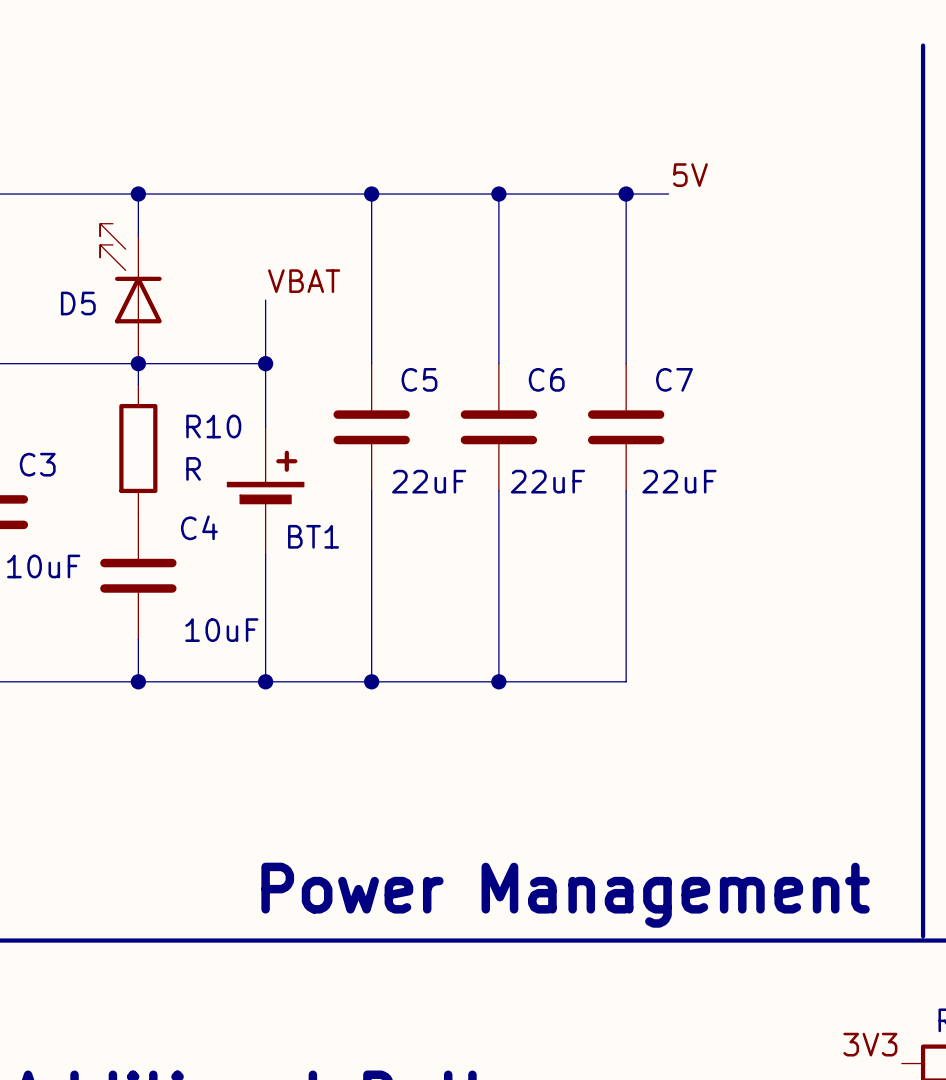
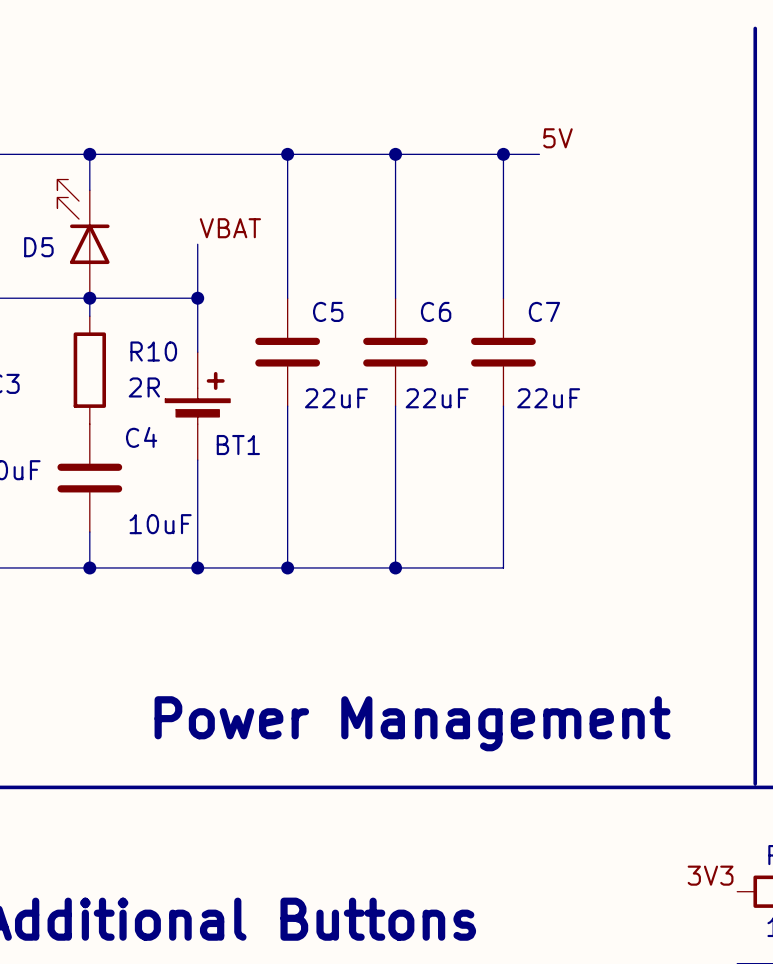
R10 value: R (193, 468) -> 2R (144, 387)
text position: Power Management (565, 895) -> Power Management (412, 723)

